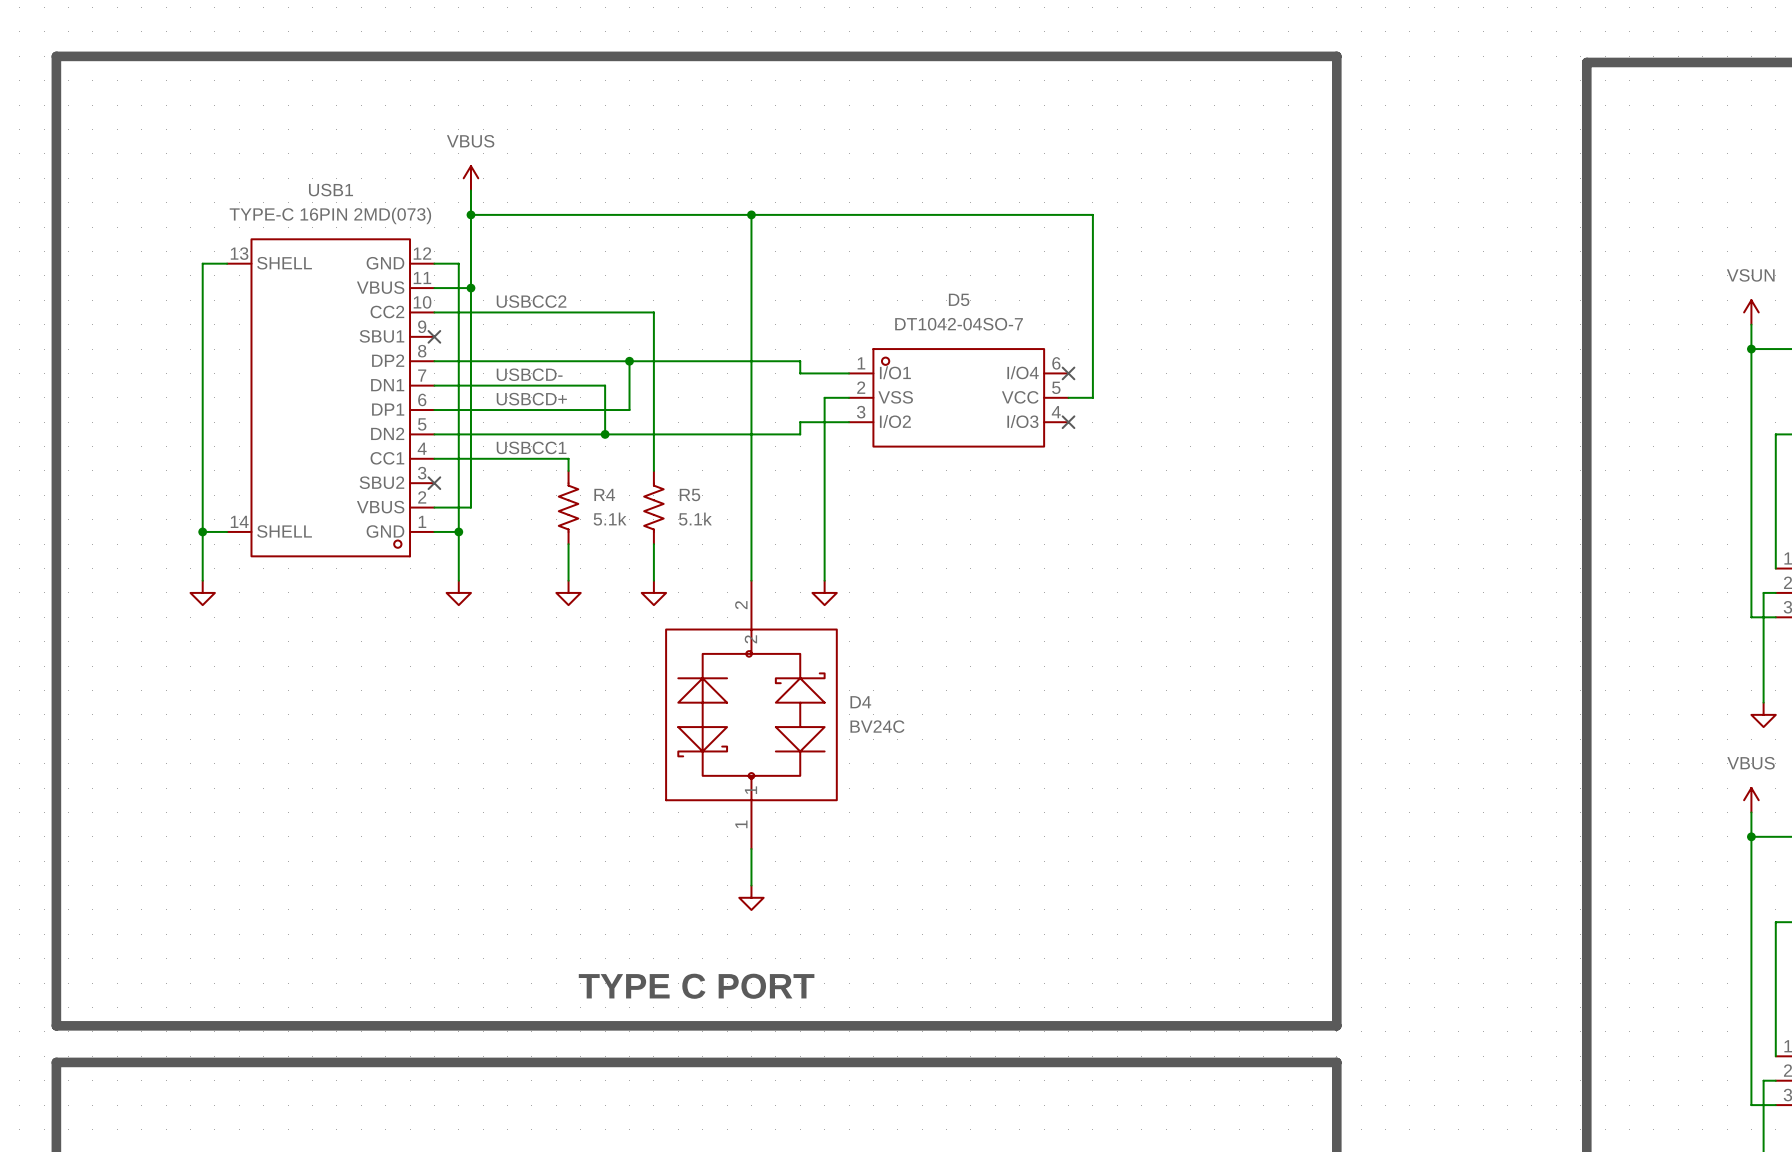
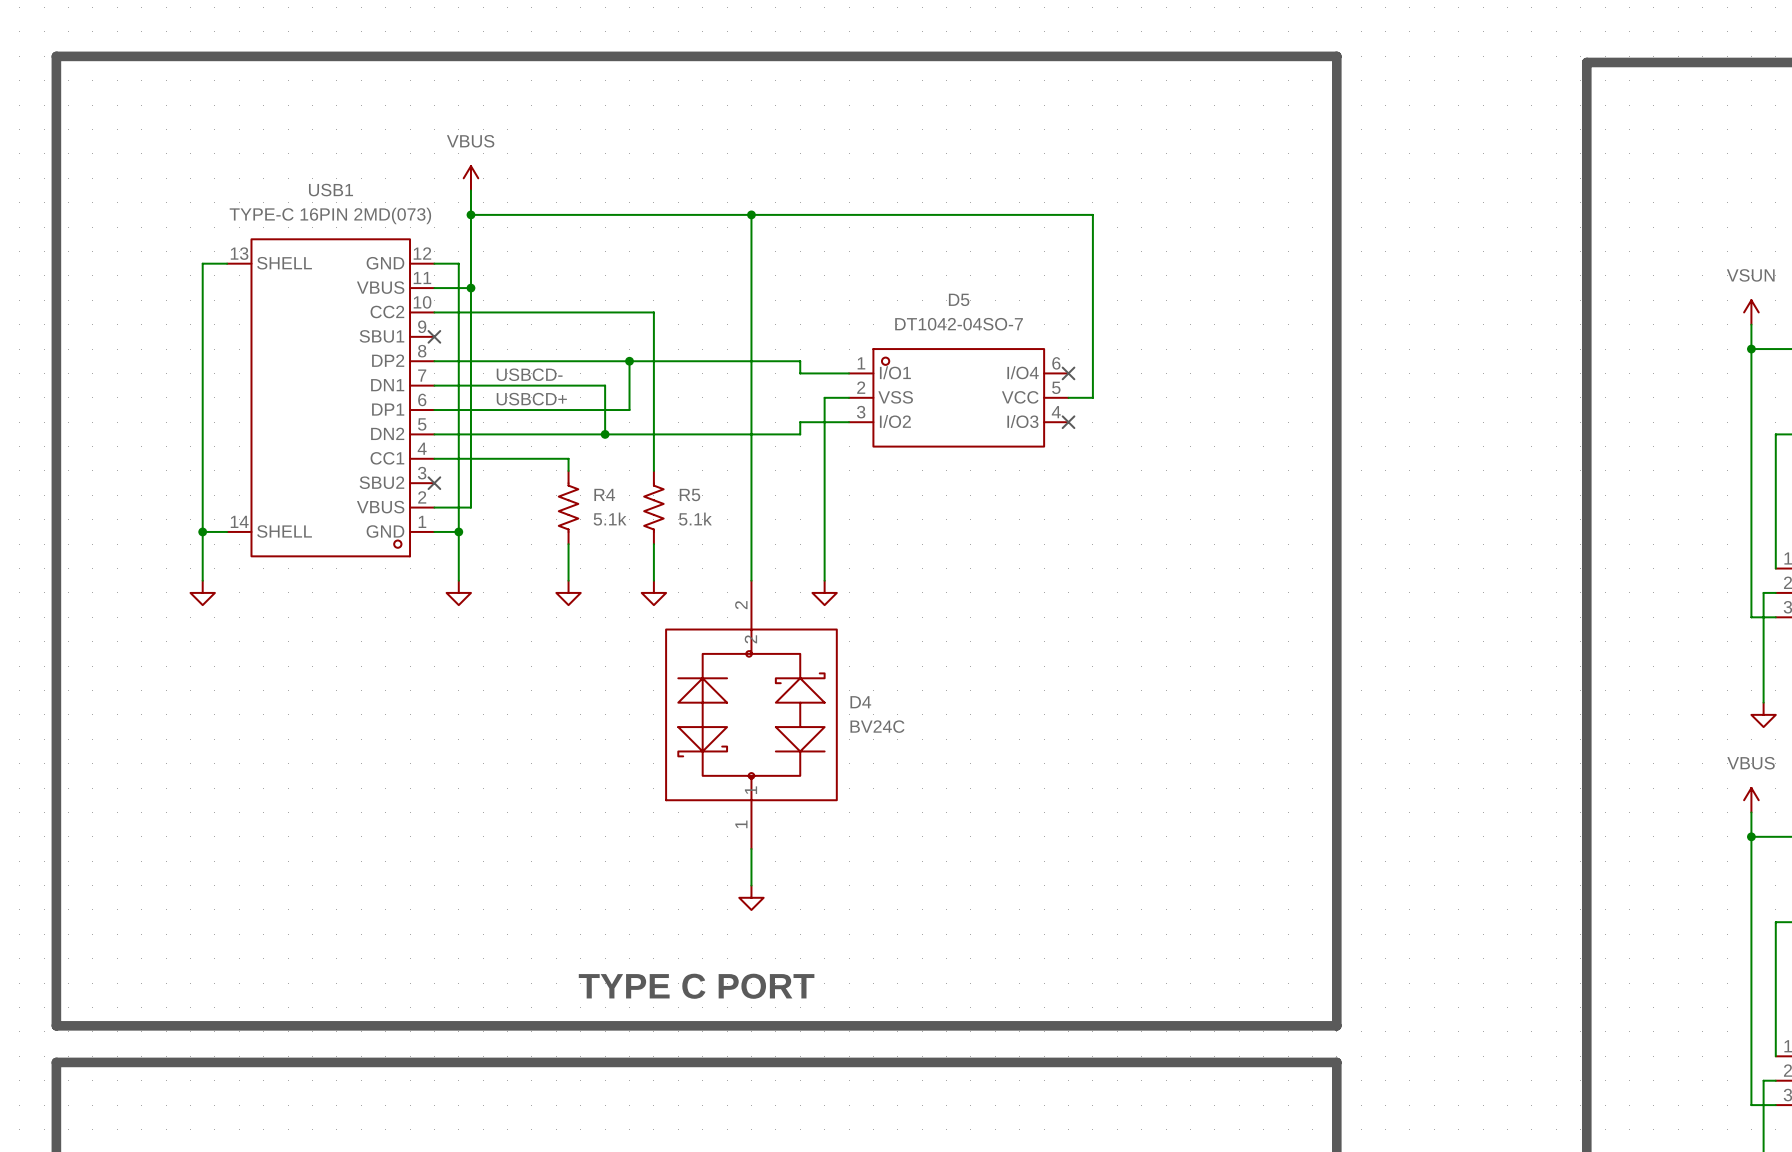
label: USBCC2 (531, 301) -> none
label: USBCC1 (531, 447) -> none

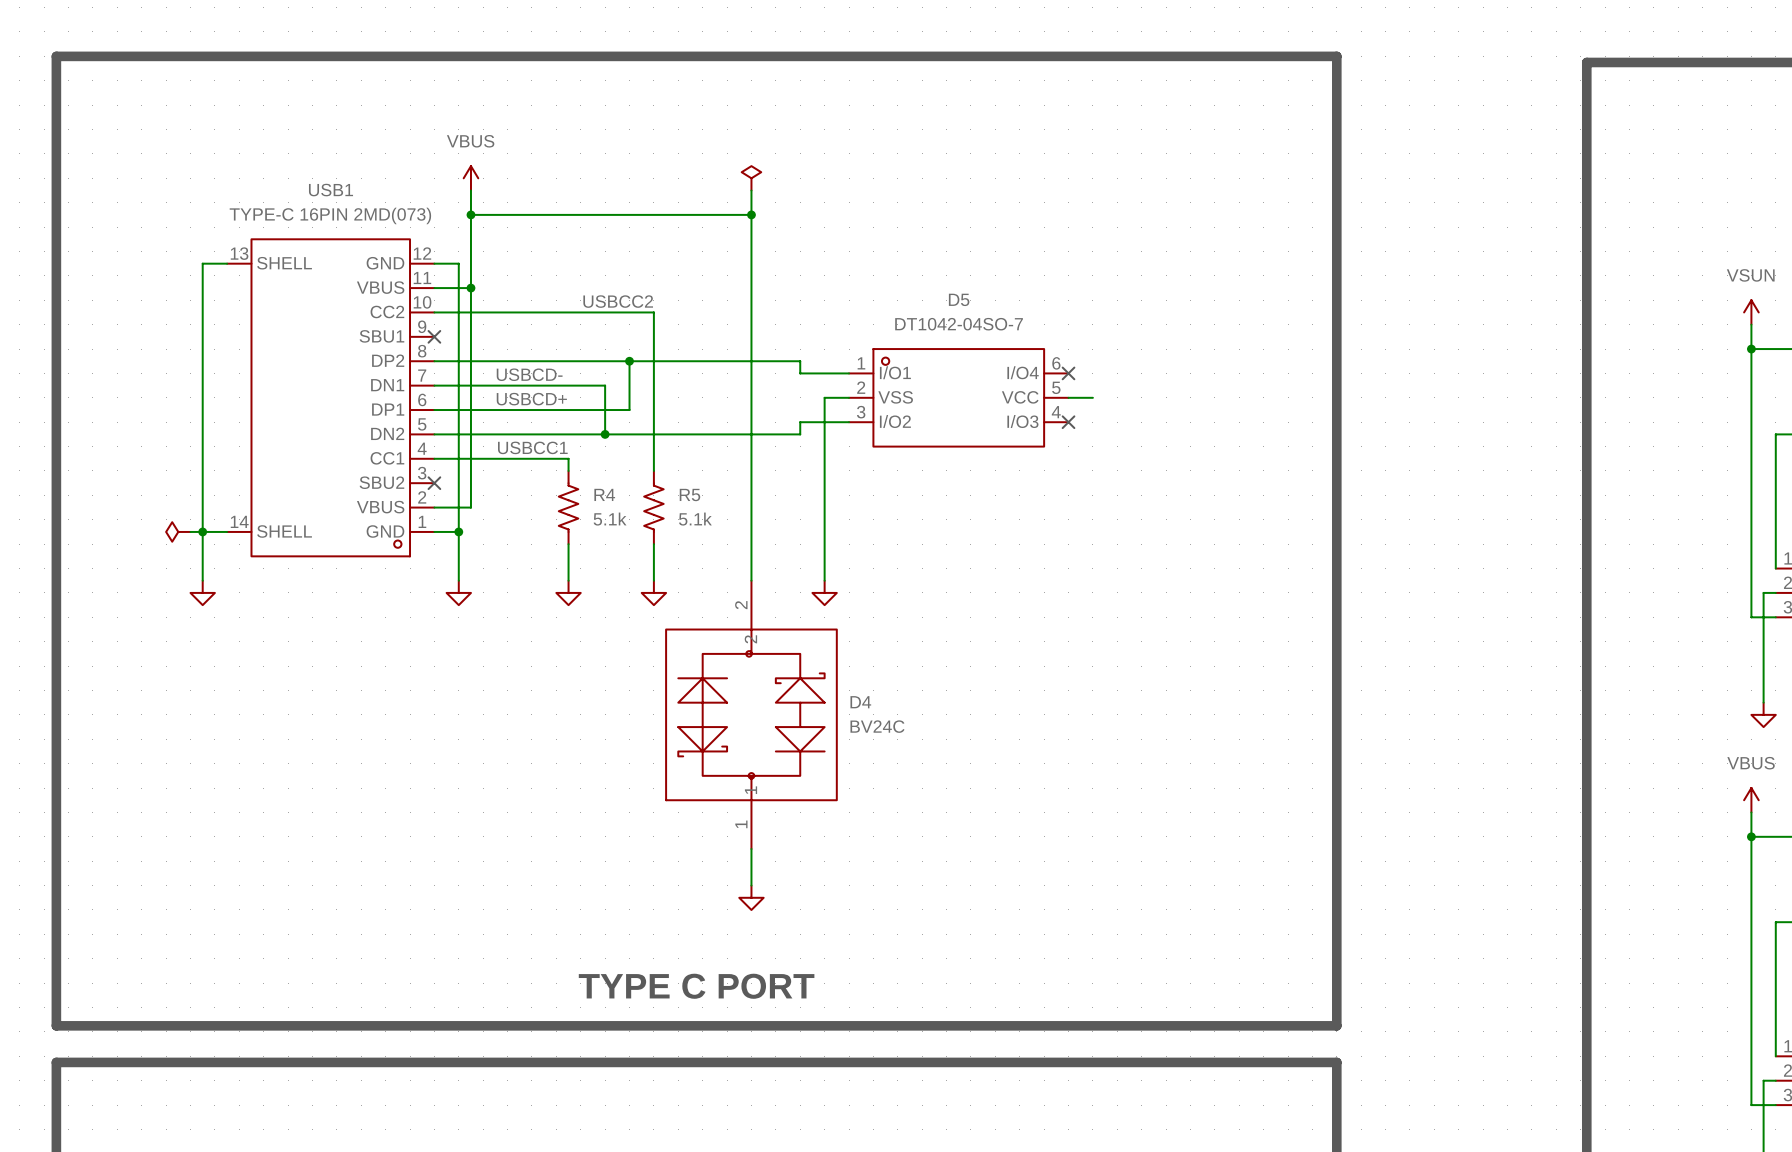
power symbol: none -> (751, 178)
wire: (751, 214) (1092, 214) (1092, 397) -> (751, 214) (751, 190)
label: none -> USBCC2 (618, 301)
label: none -> USBCC1 (532, 447)
power symbol: none -> (178, 531)
wire: none -> (190, 531) (202, 531)

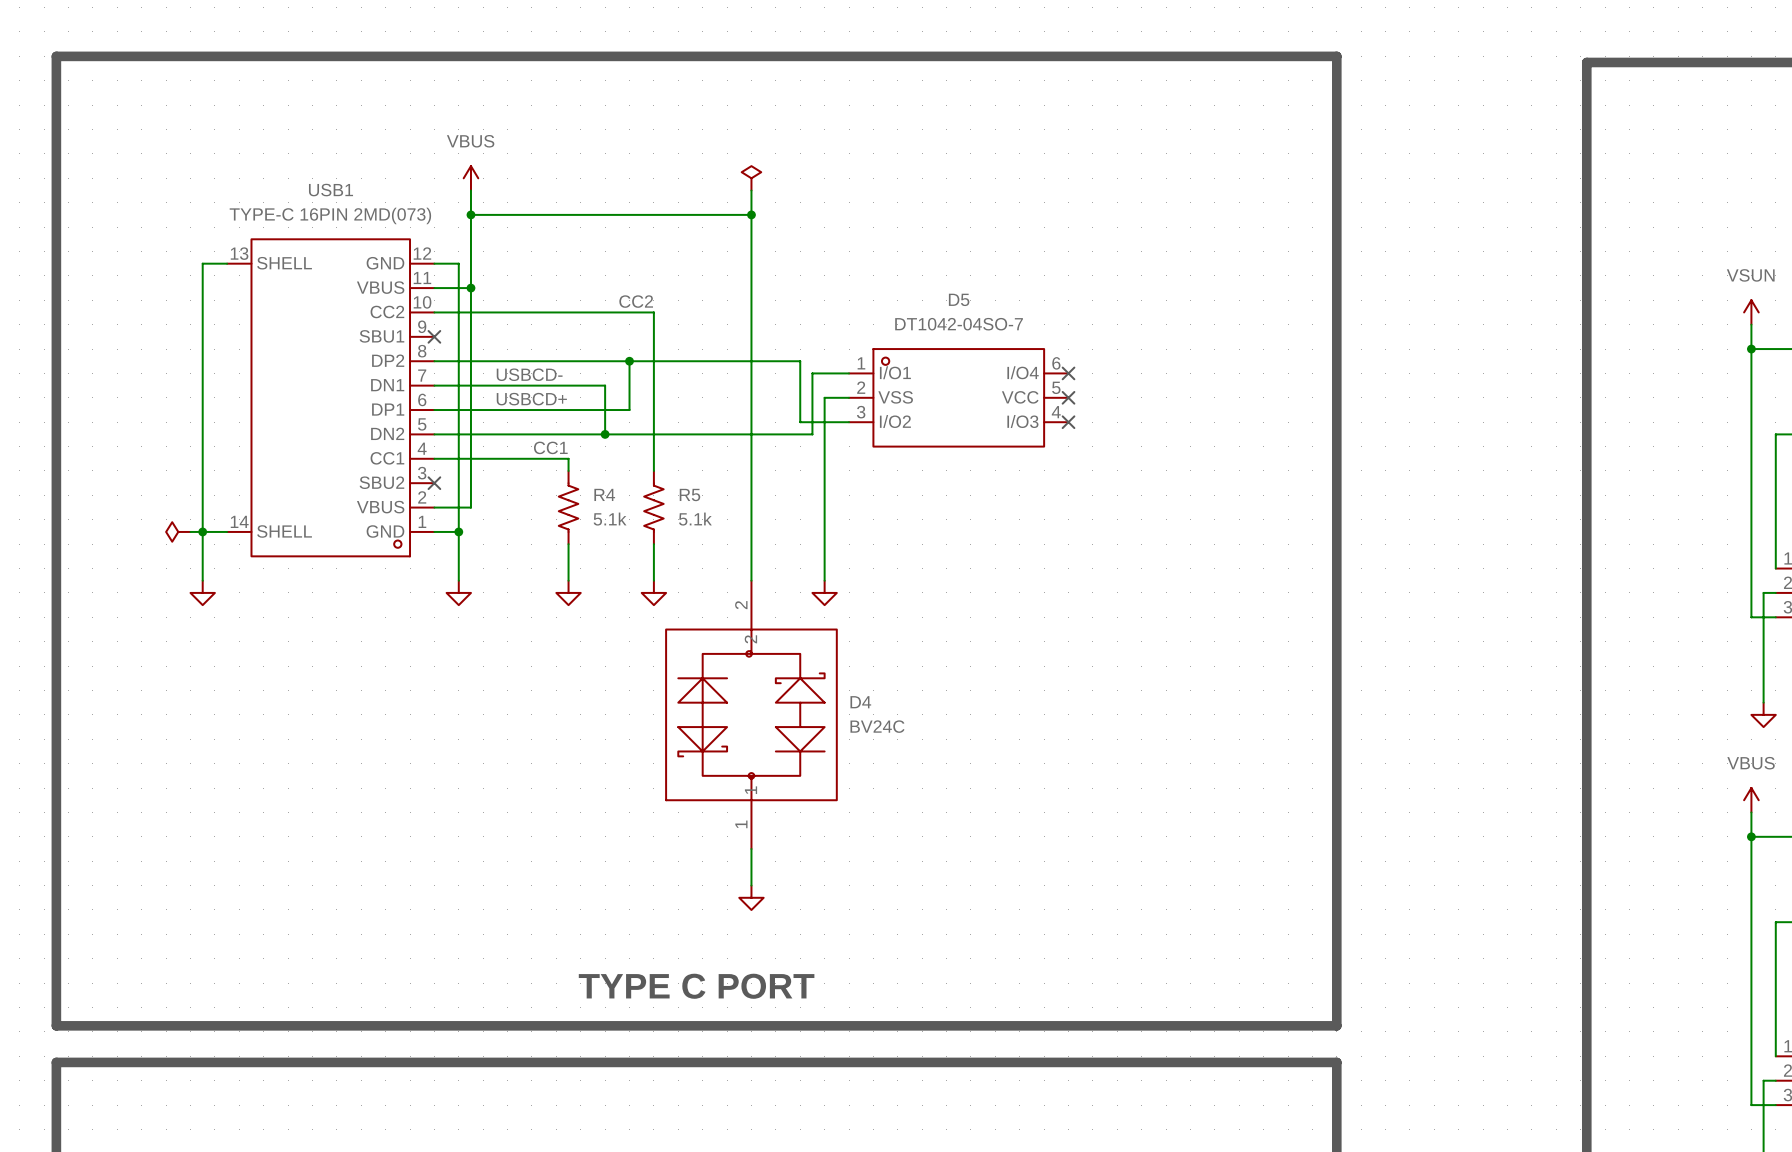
label: USBCC2 (618, 301) -> CC2 (636, 301)
wire: (800, 373) (812, 373) -> (800, 373) (800, 422)
wire: (1068, 397) (1092, 397) -> none
no-connect mark: none -> (1068, 397)
wire: (800, 422) (800, 434) -> (812, 373) (812, 434) (800, 434)
label: USBCC1 (532, 447) -> CC1 (550, 447)

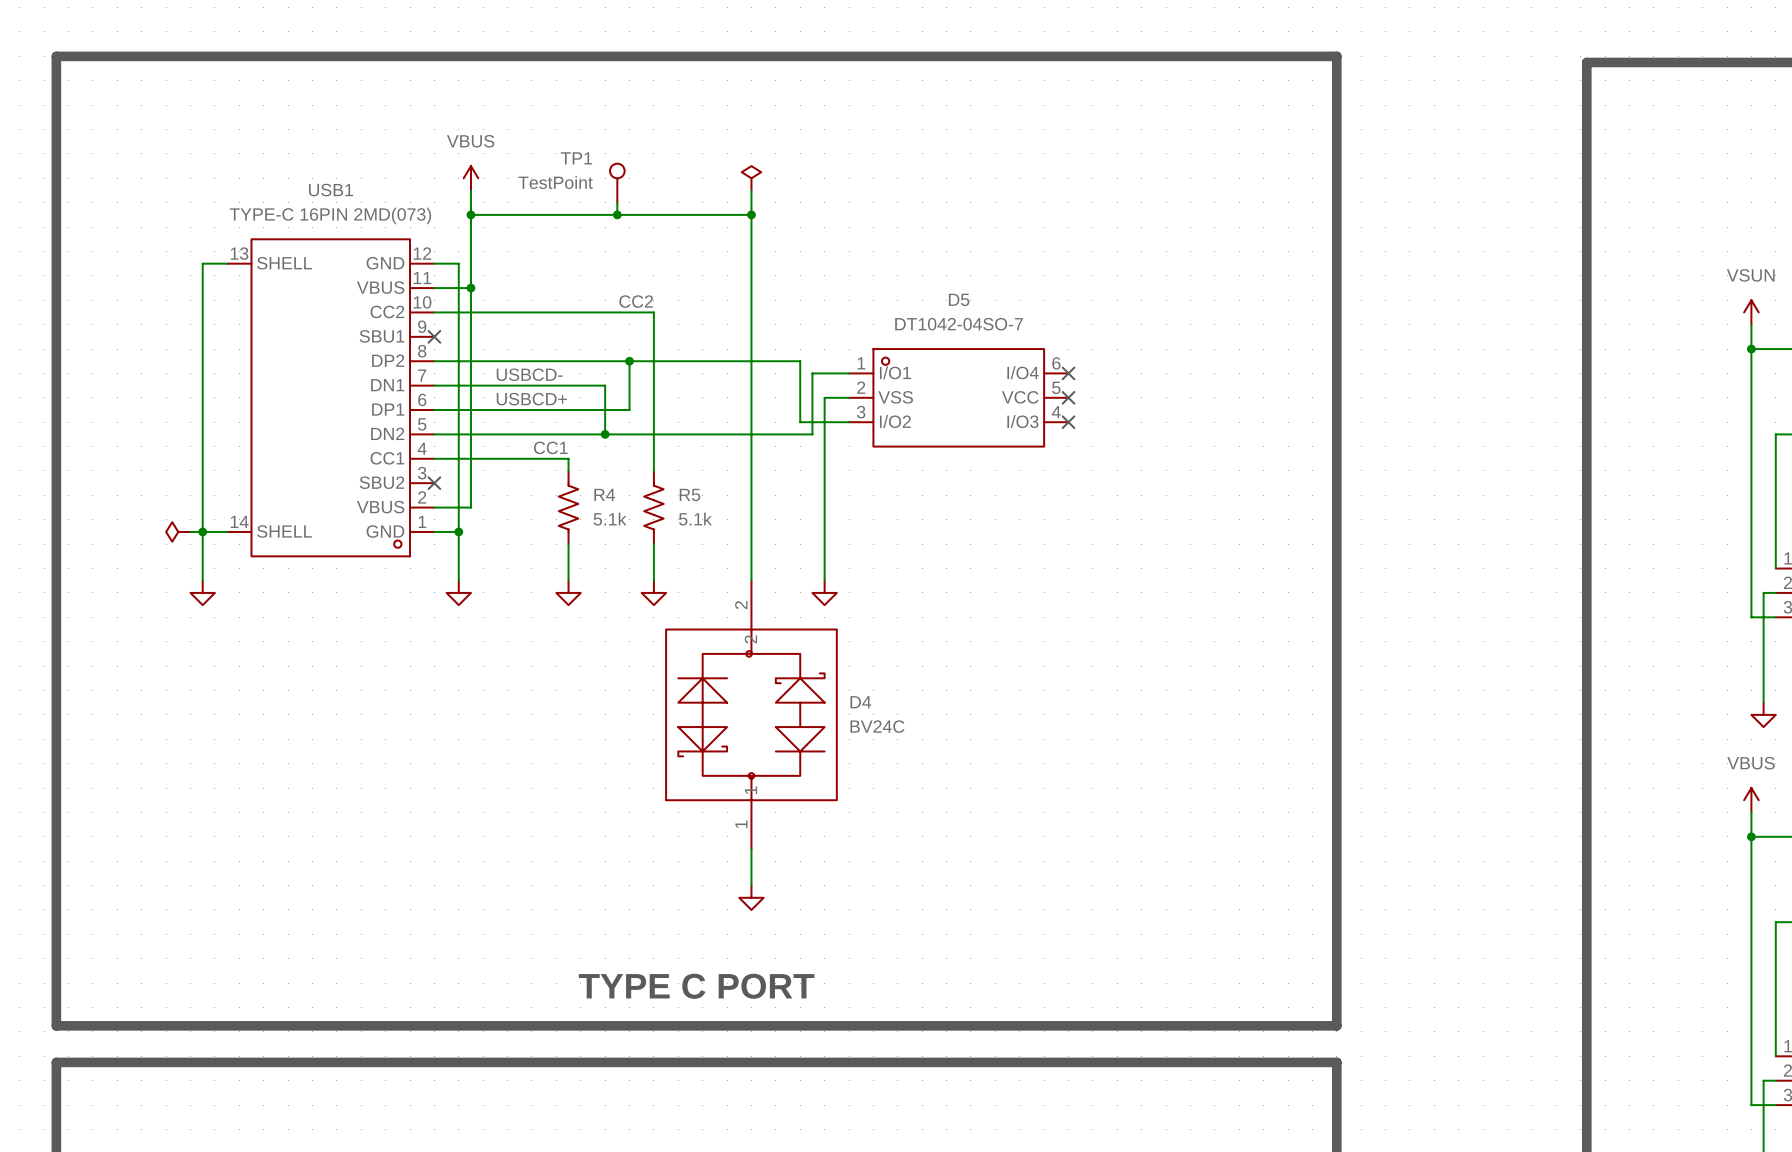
TP1: none -> TestPoint (617, 183)
wire: none -> (617, 202) (617, 214)
junction: none -> (617, 214)

